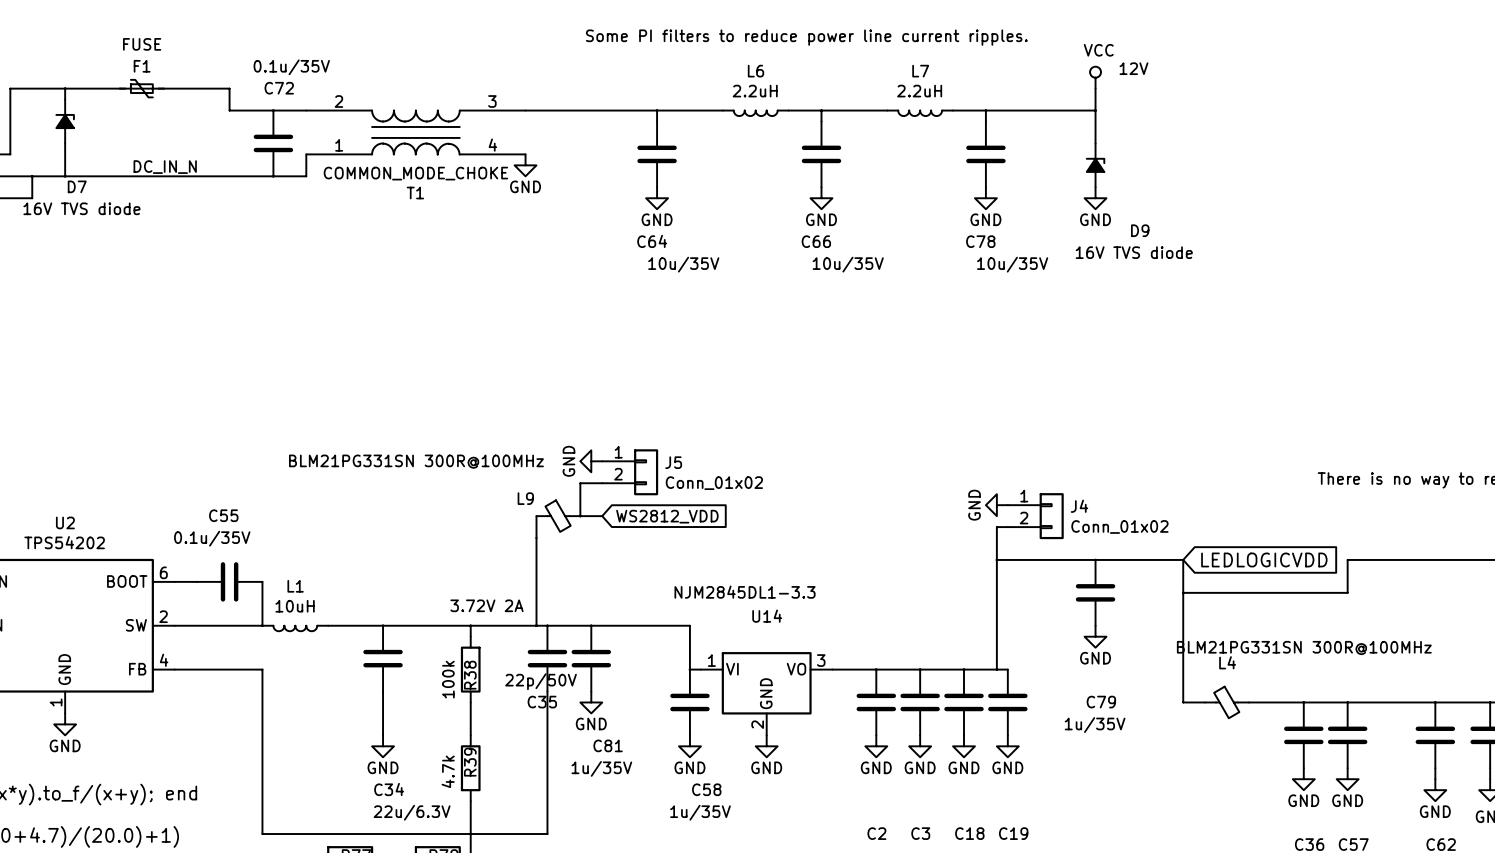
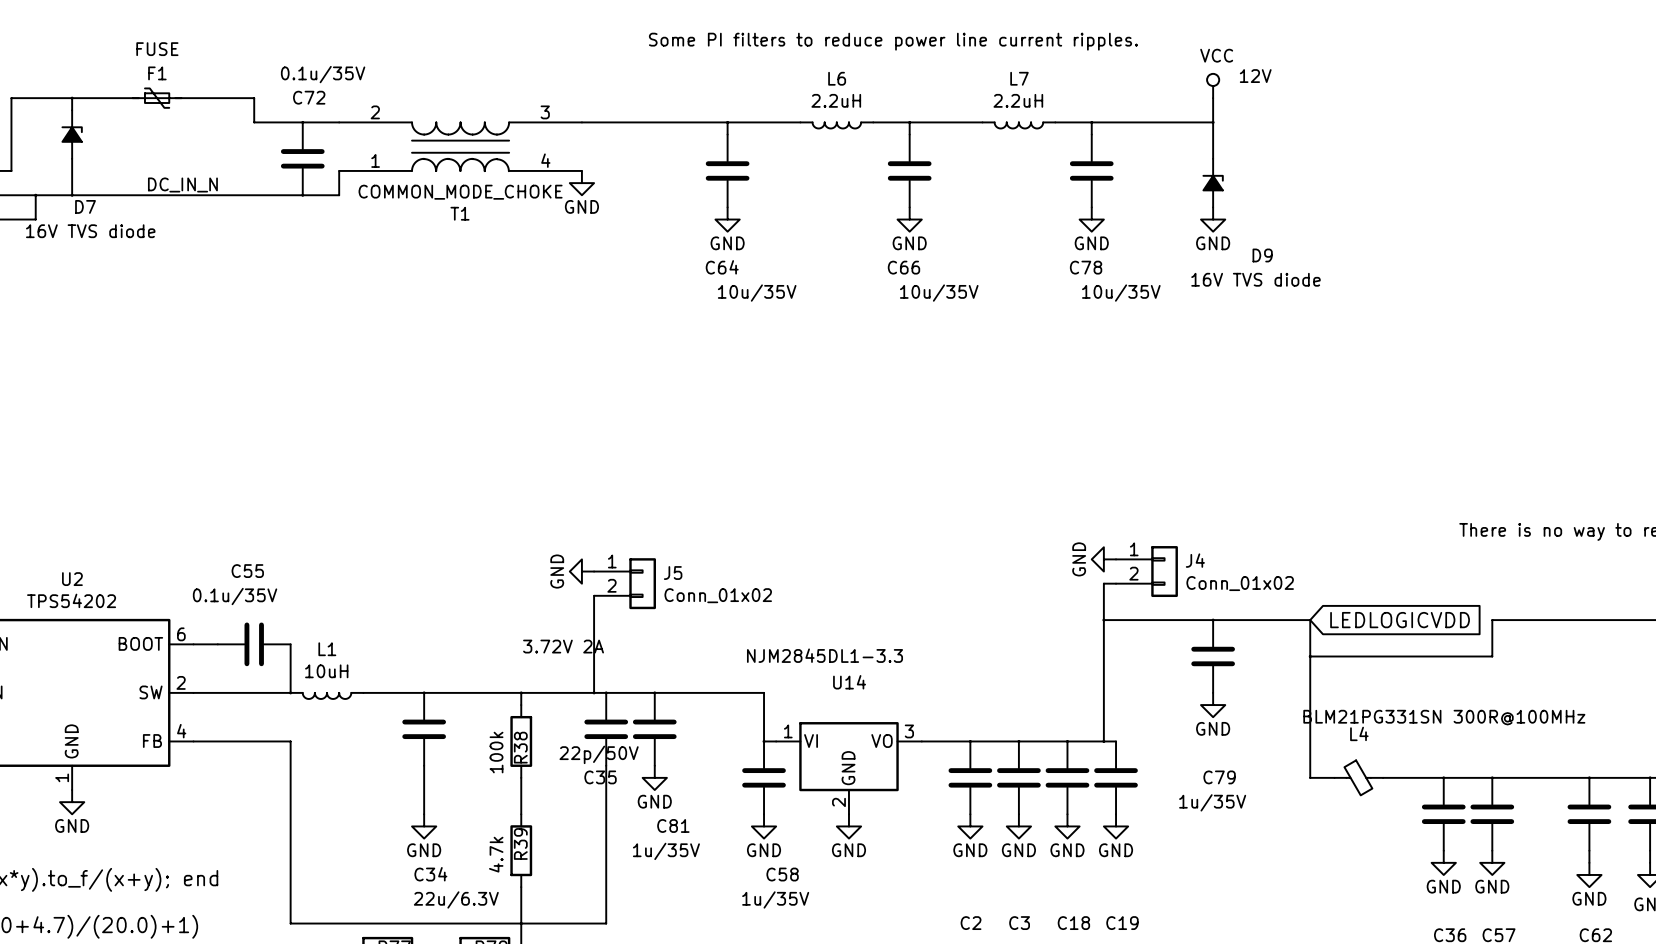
power symbol position: GND (591, 461) -> GND (581, 571)
J5 position: (630, 472) -> (625, 583)
wire: (602, 483) (580, 483) (580, 516) (602, 516) -> none
wire: (536, 516) (536, 538) -> none
L9: BLM21PG331SN 300R@100MHz (558, 516) -> none
global label: WS2812_VDD (667, 516) -> none
text position: 3.72V 2A (486, 605) -> 3.72V 2A (563, 646)

